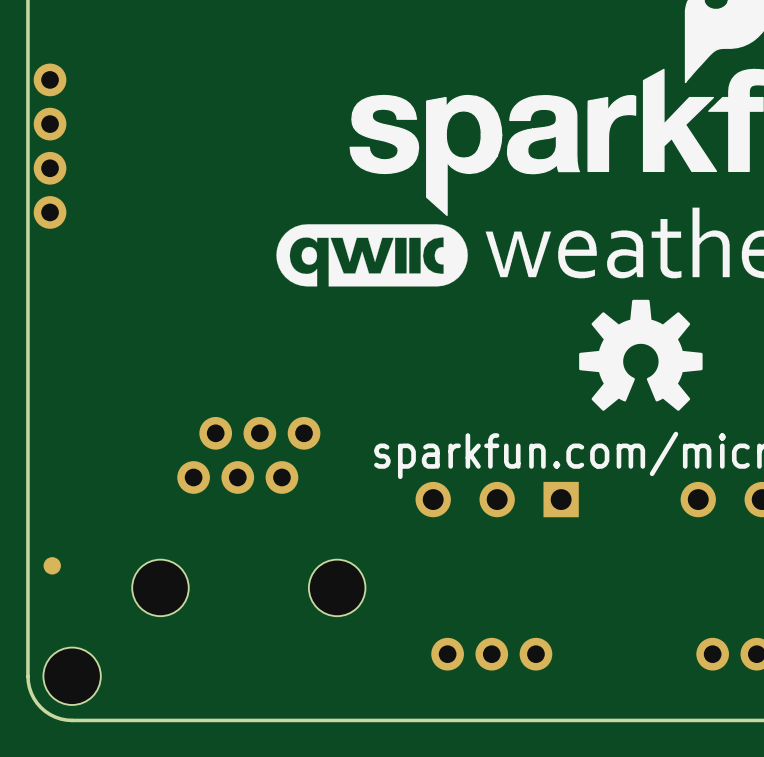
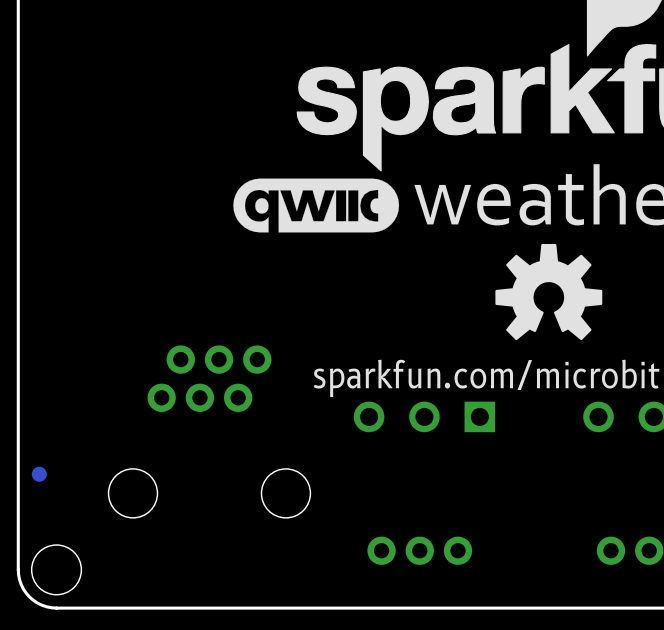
part: (50, 146) -> none

